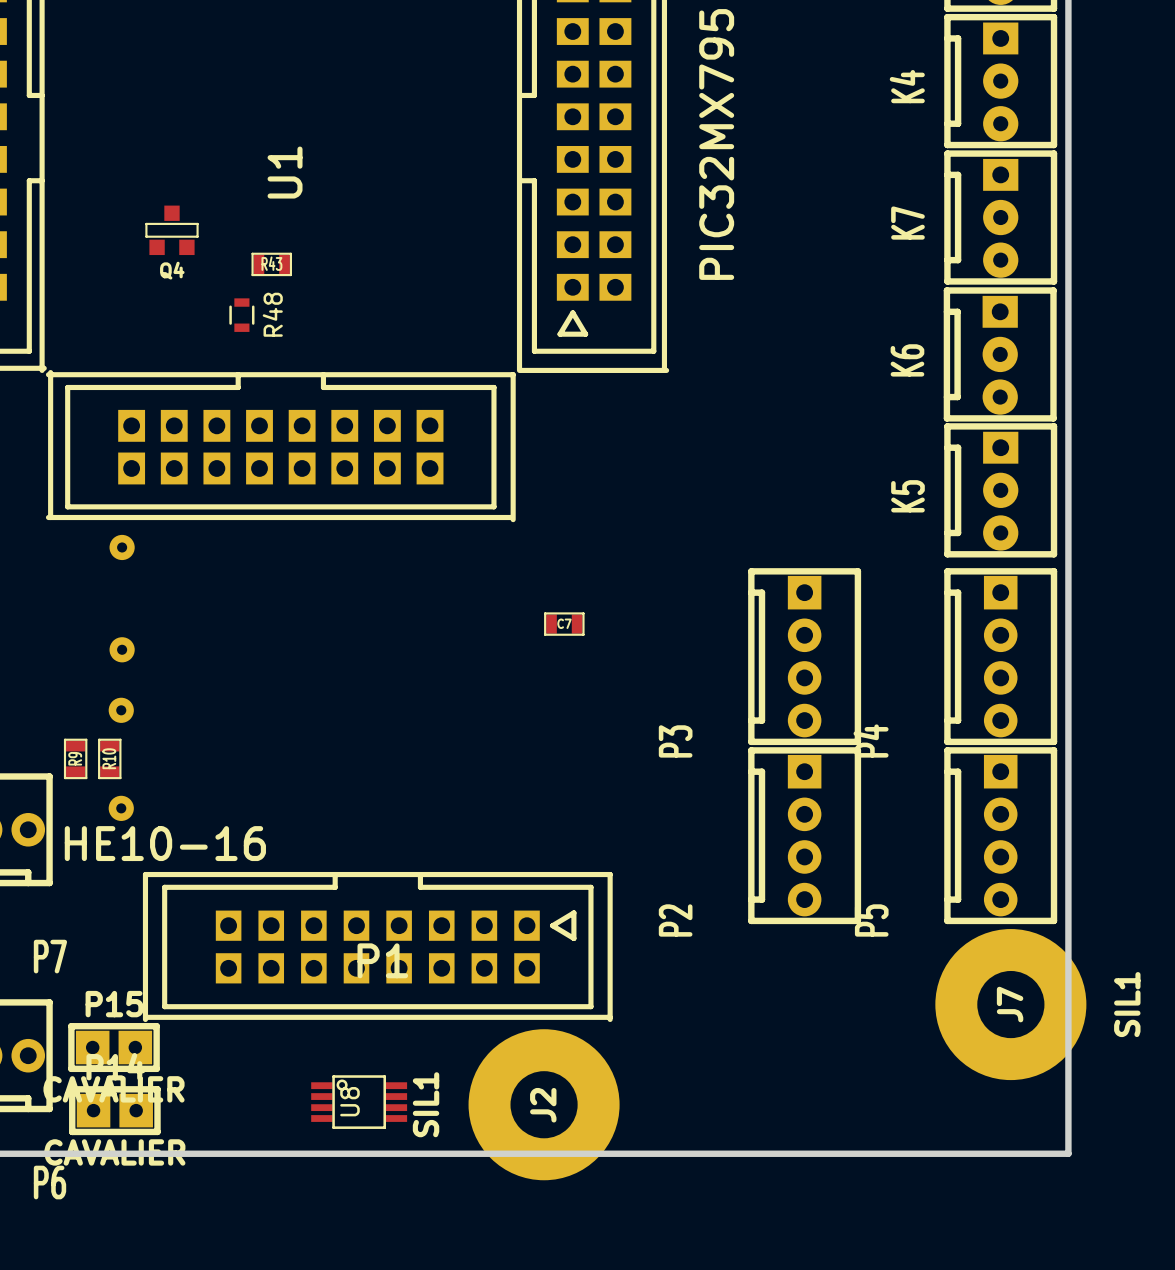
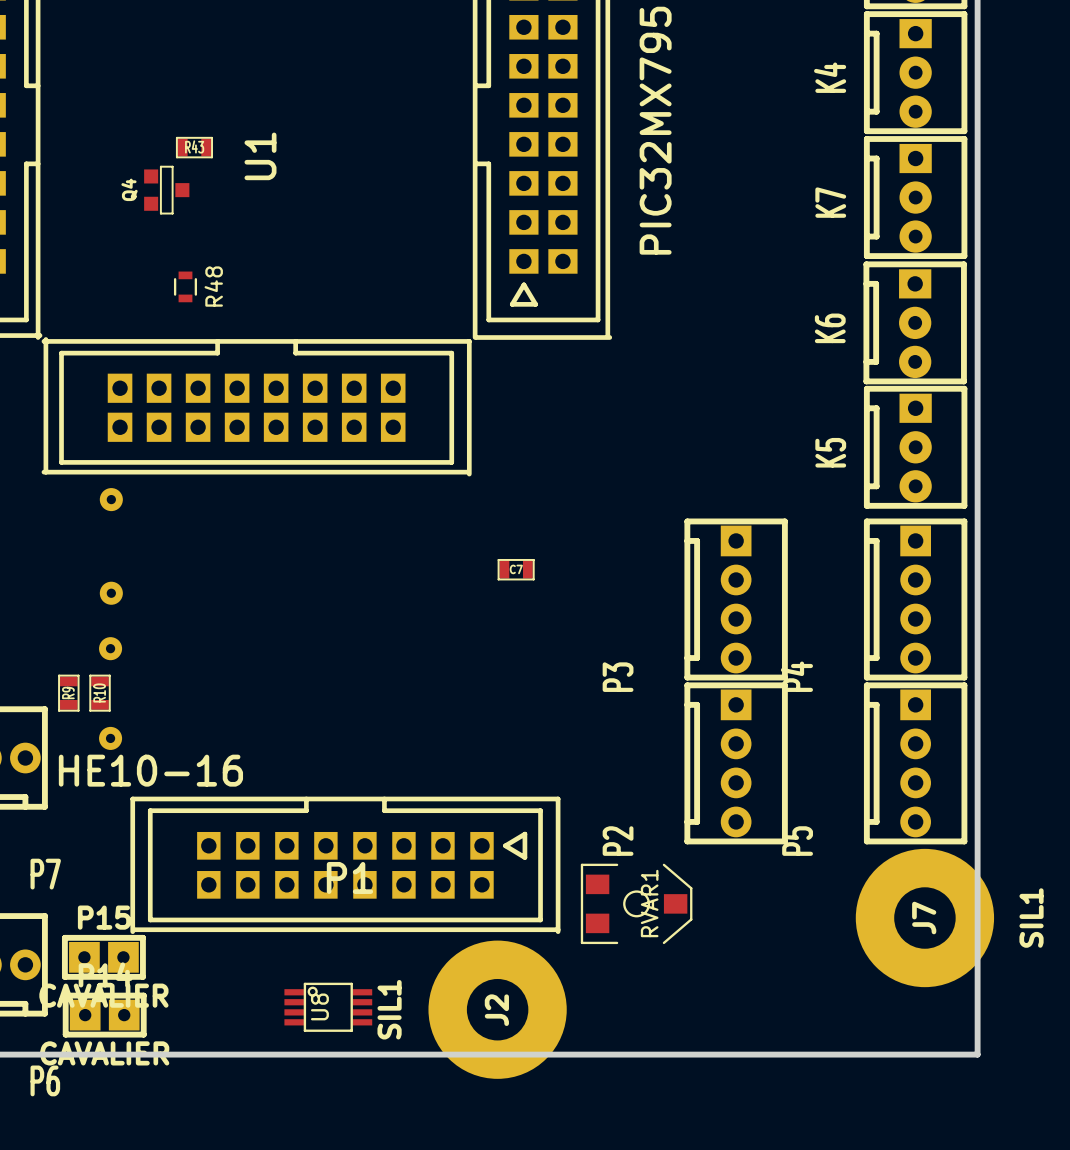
Q4 rotation: 0° (171, 230) -> 90° clockwise (166, 190)
R43 position: (271, 264) -> (194, 147)
R48 position: (241, 315) -> (185, 286)
RVAR1: none -> (636, 903)

